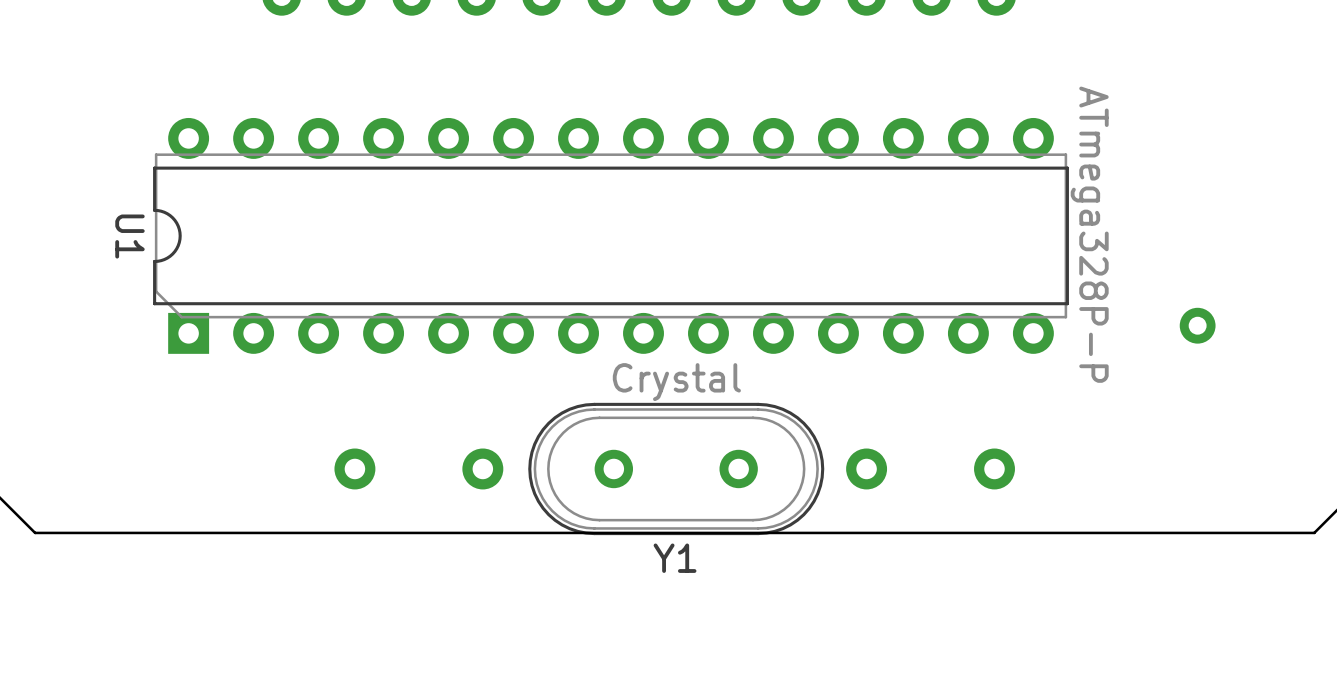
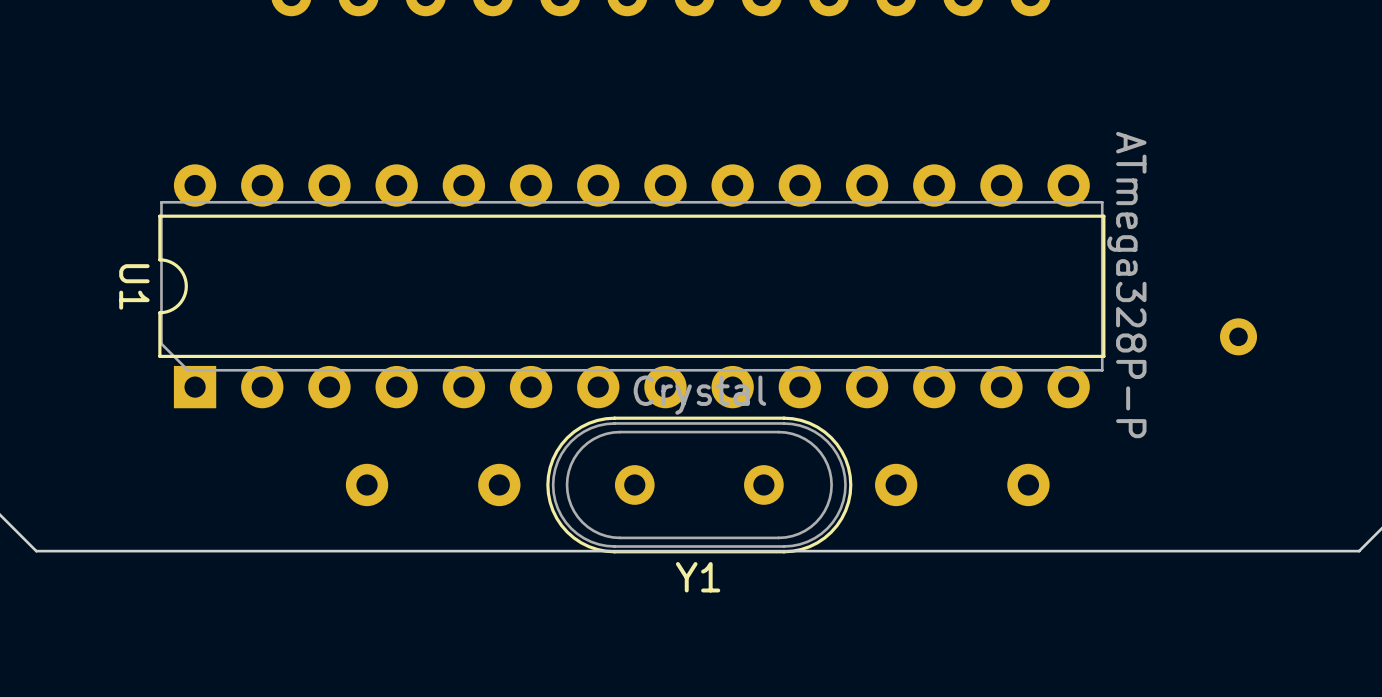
U1 position: (611, 235) -> (631, 286)

